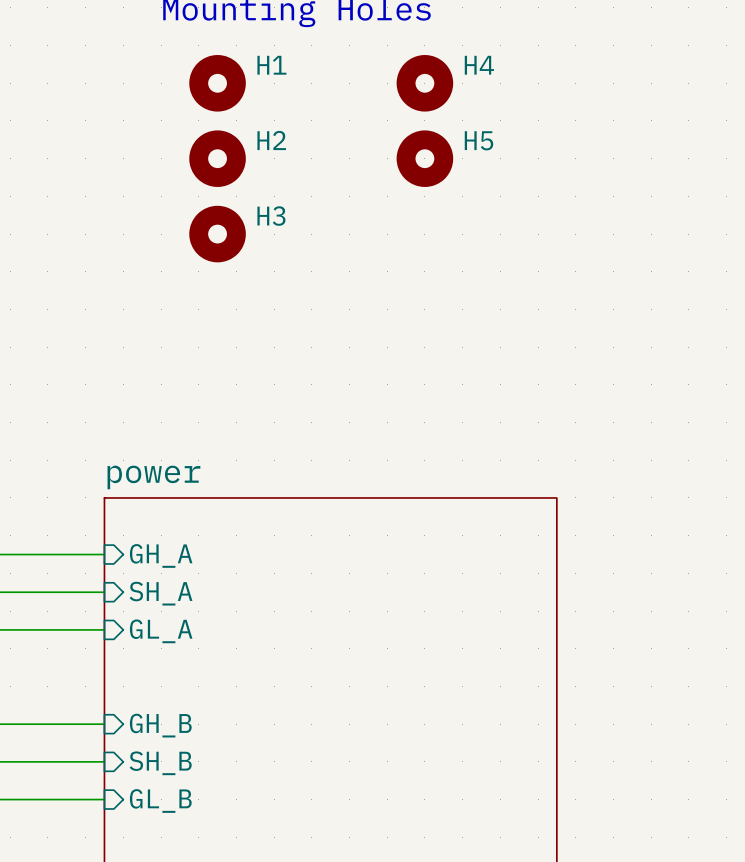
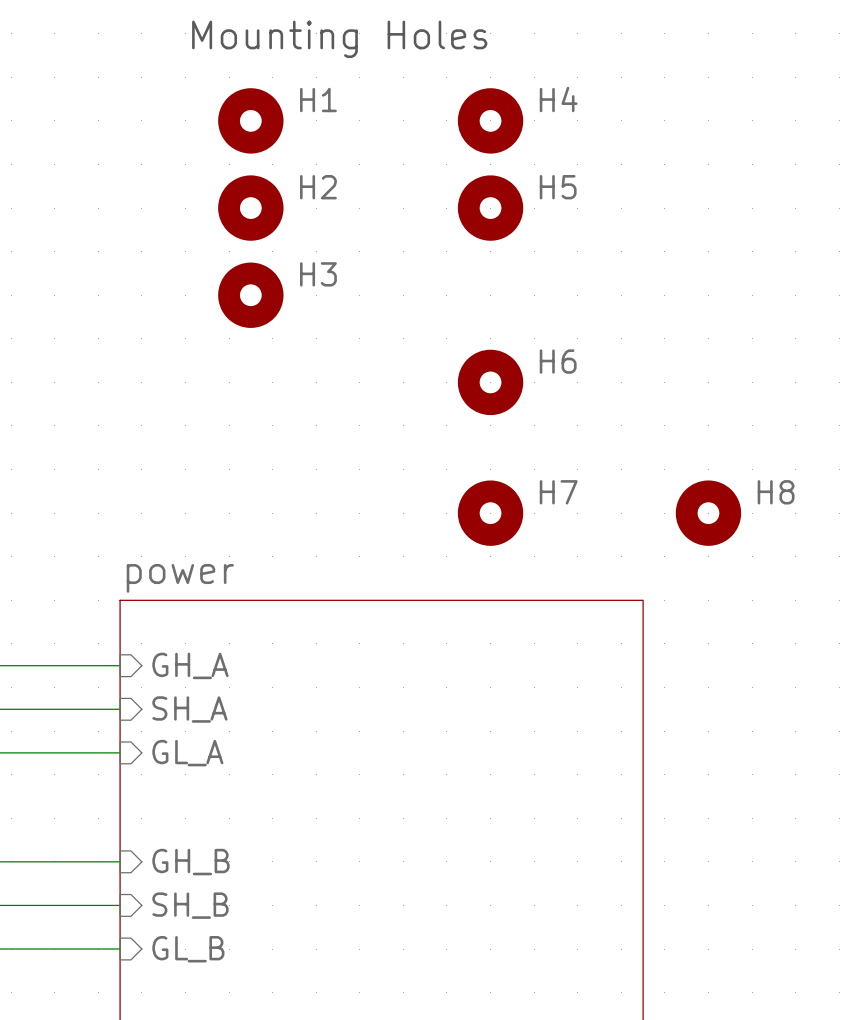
H6: none -> (490, 382)
H7: none -> (490, 513)
H8: none -> (708, 513)

